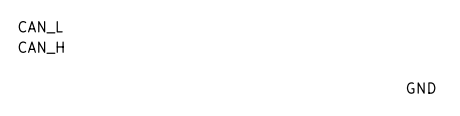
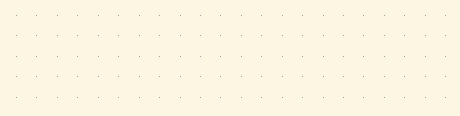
label: CAN_L (40, 27) -> none
label: CAN_H (41, 47) -> none
label: GND (421, 88) -> none

